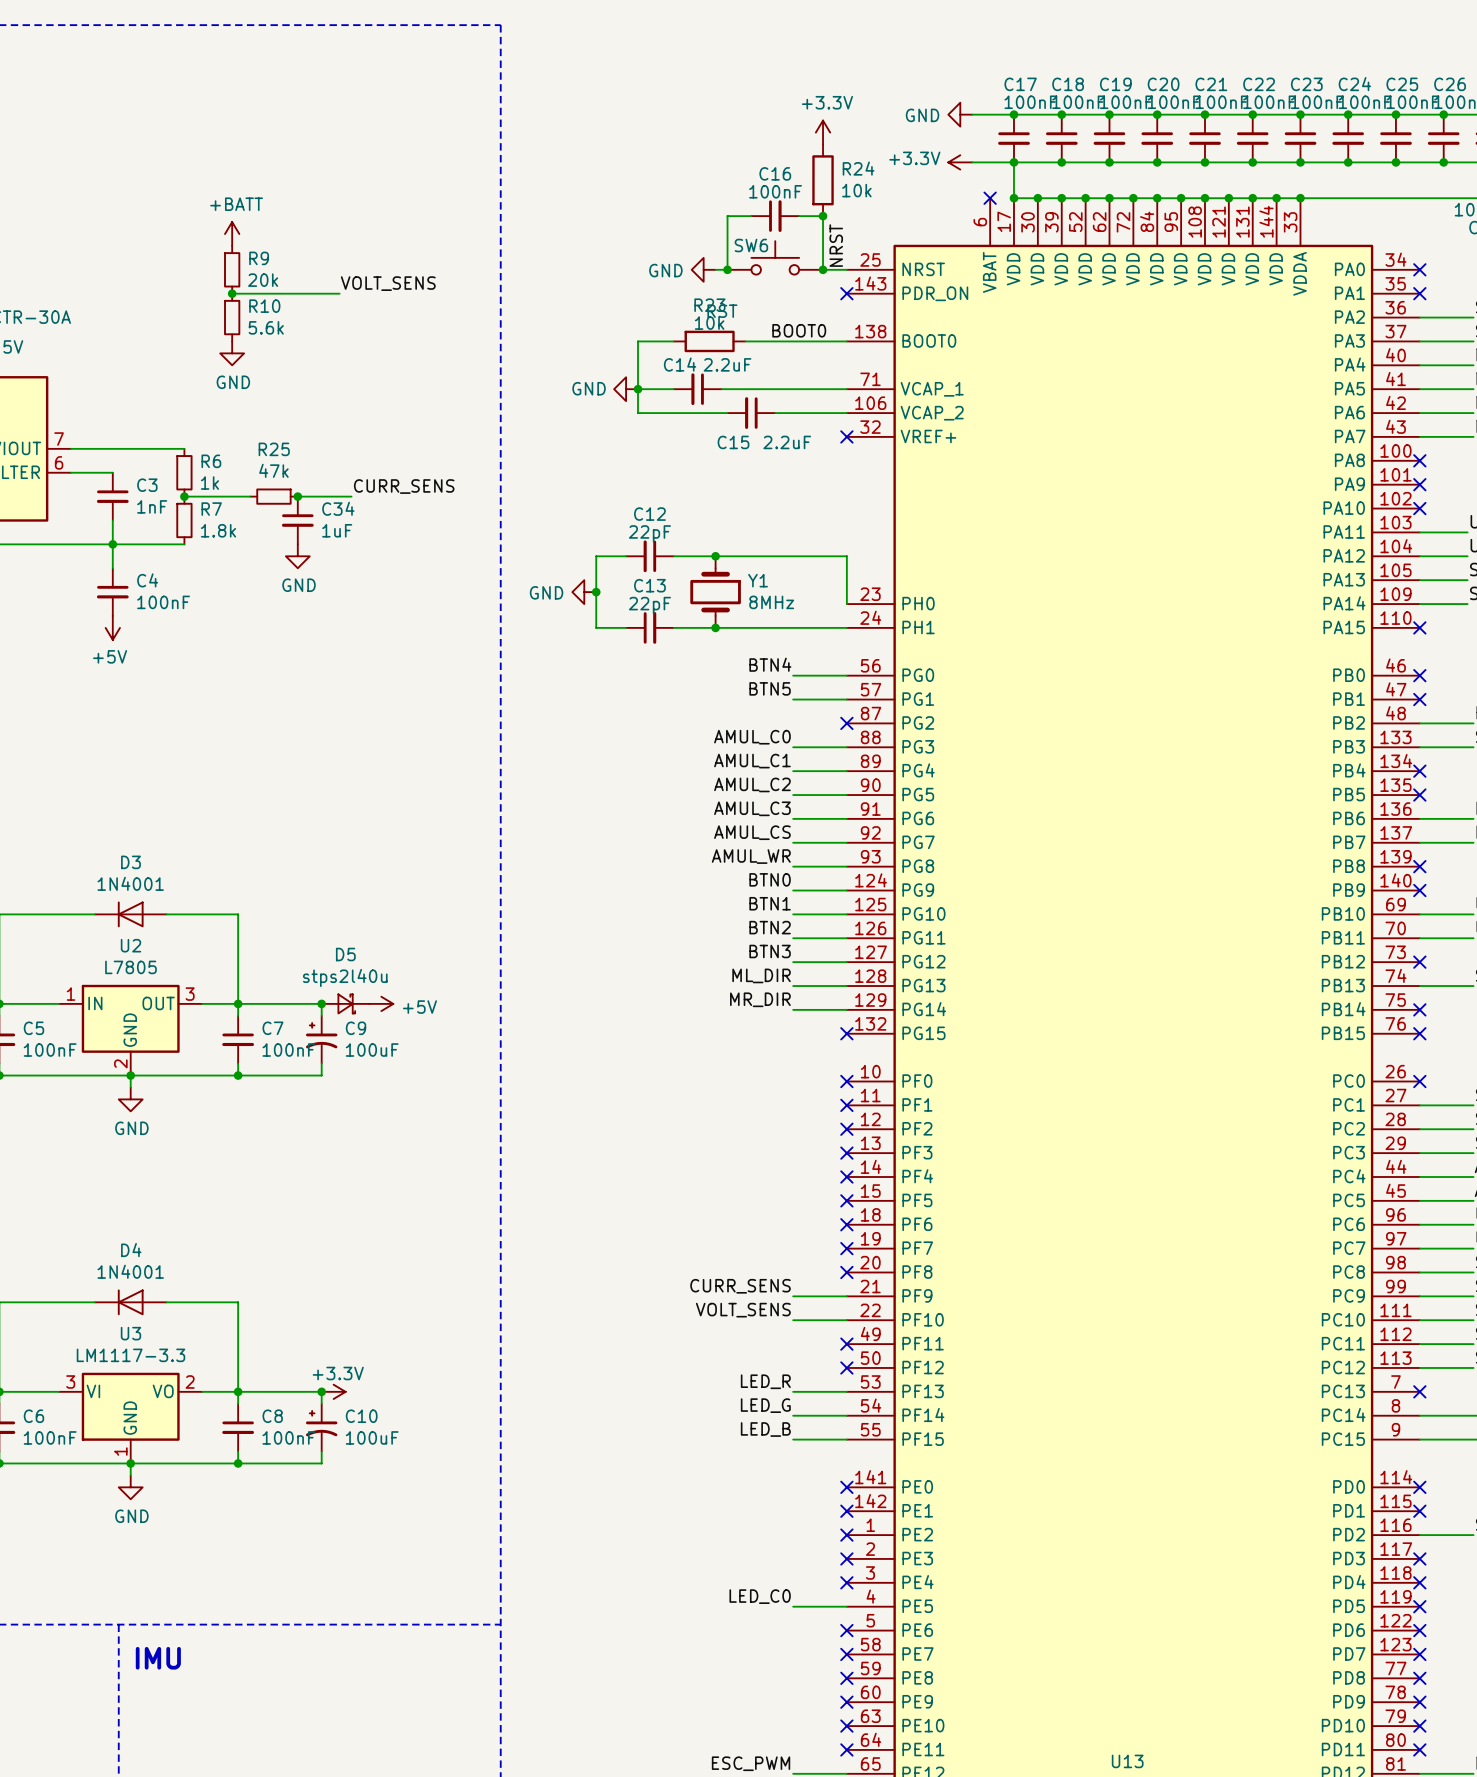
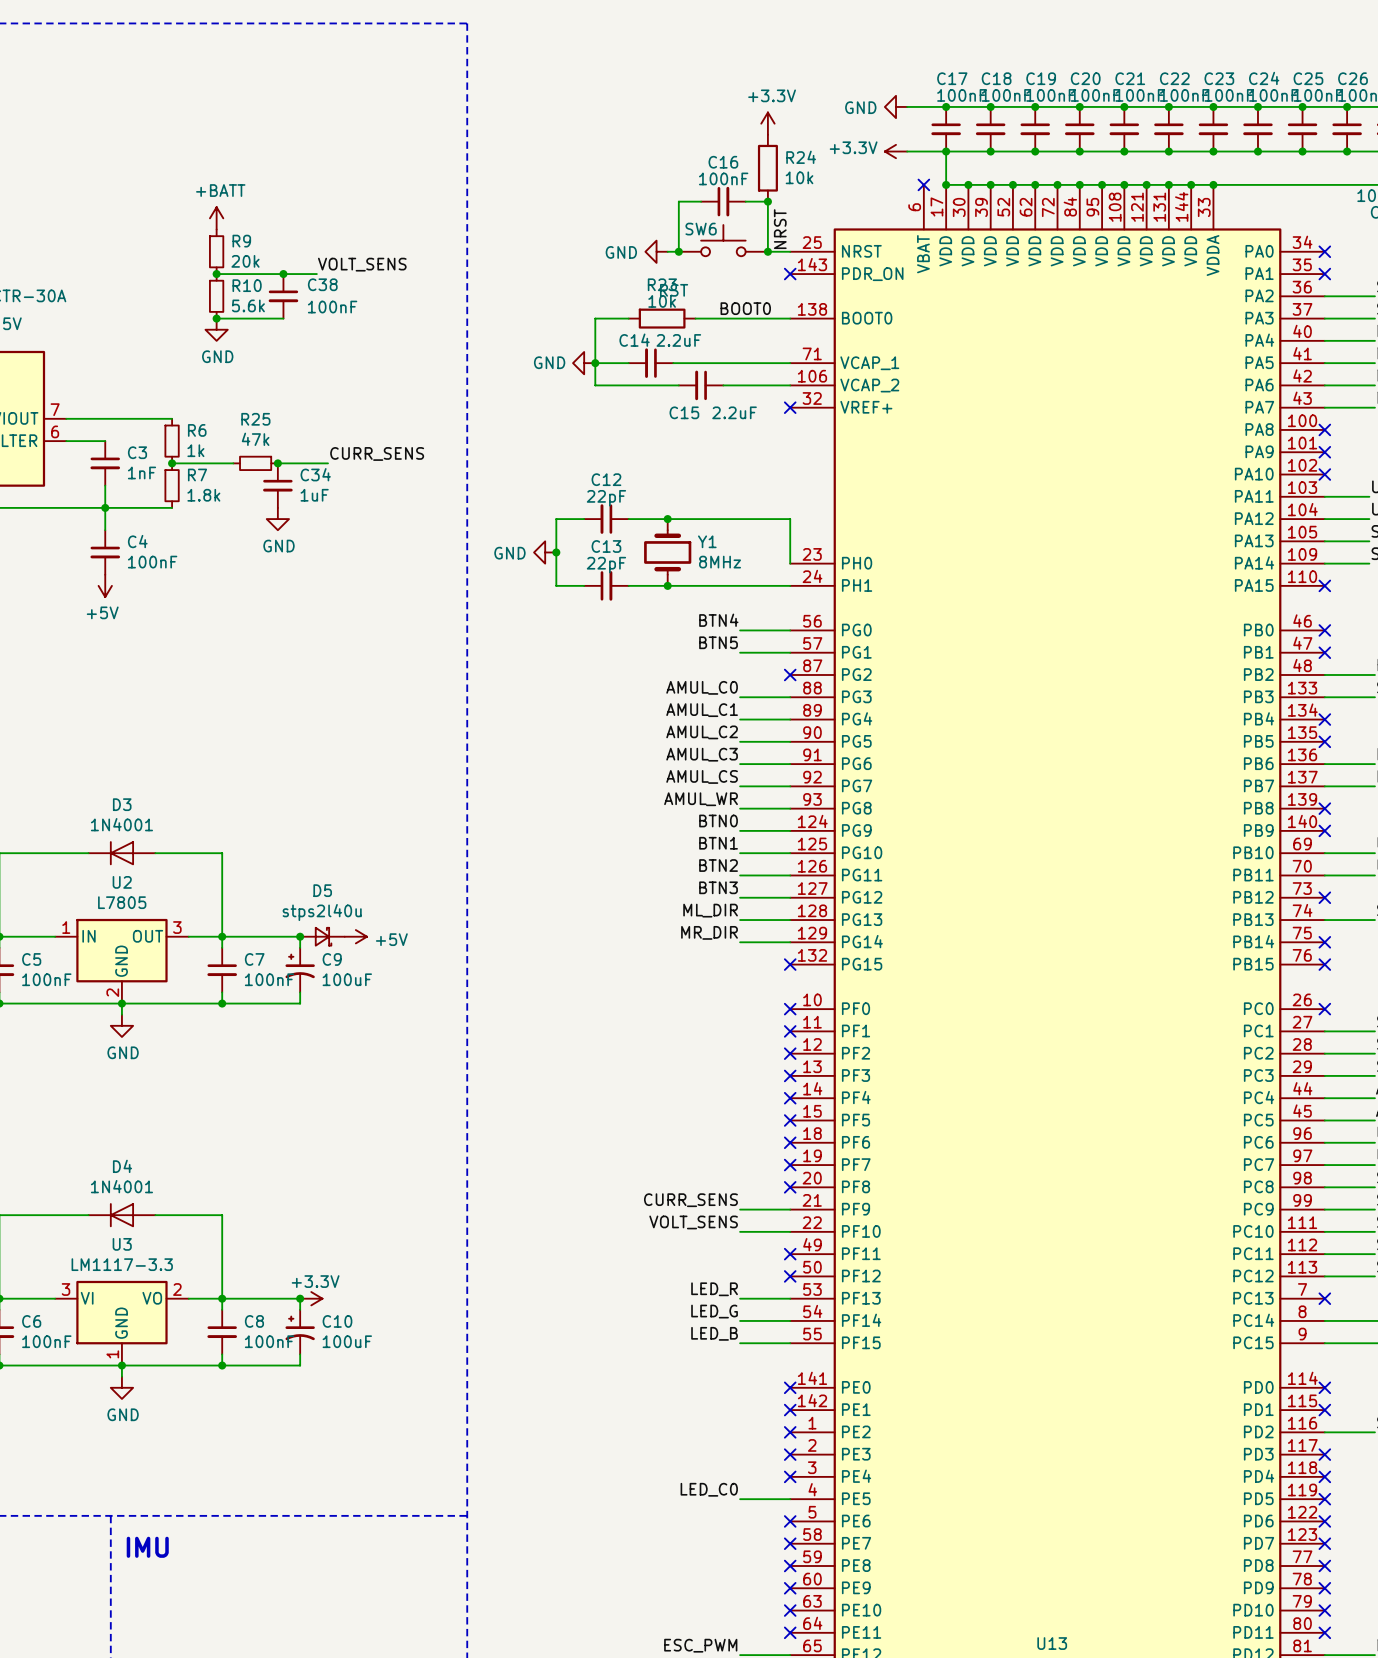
junction: none -> (283, 274)
C38: none -> 100nF (283, 296)
wire: none -> (216, 318) (283, 318)
junction: none -> (216, 318)

